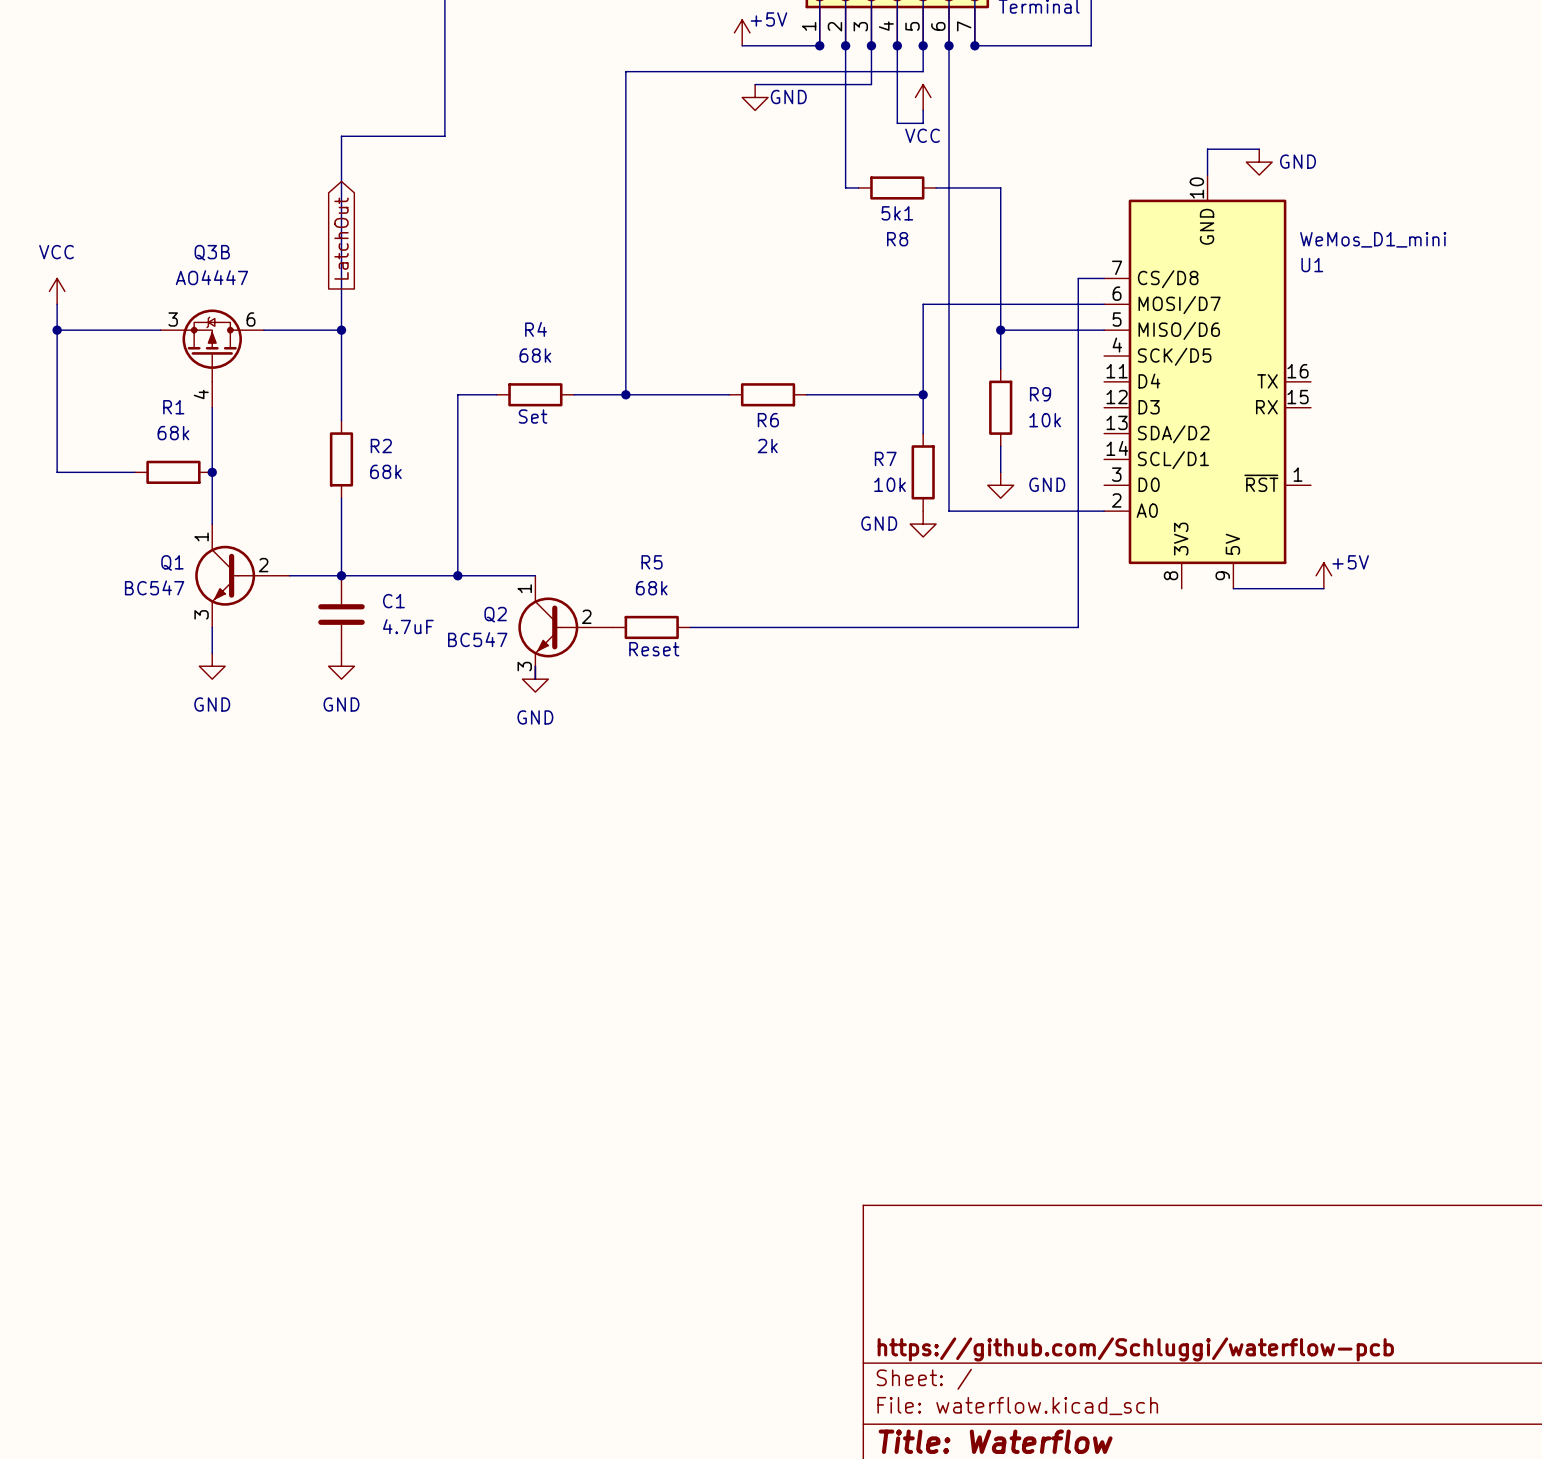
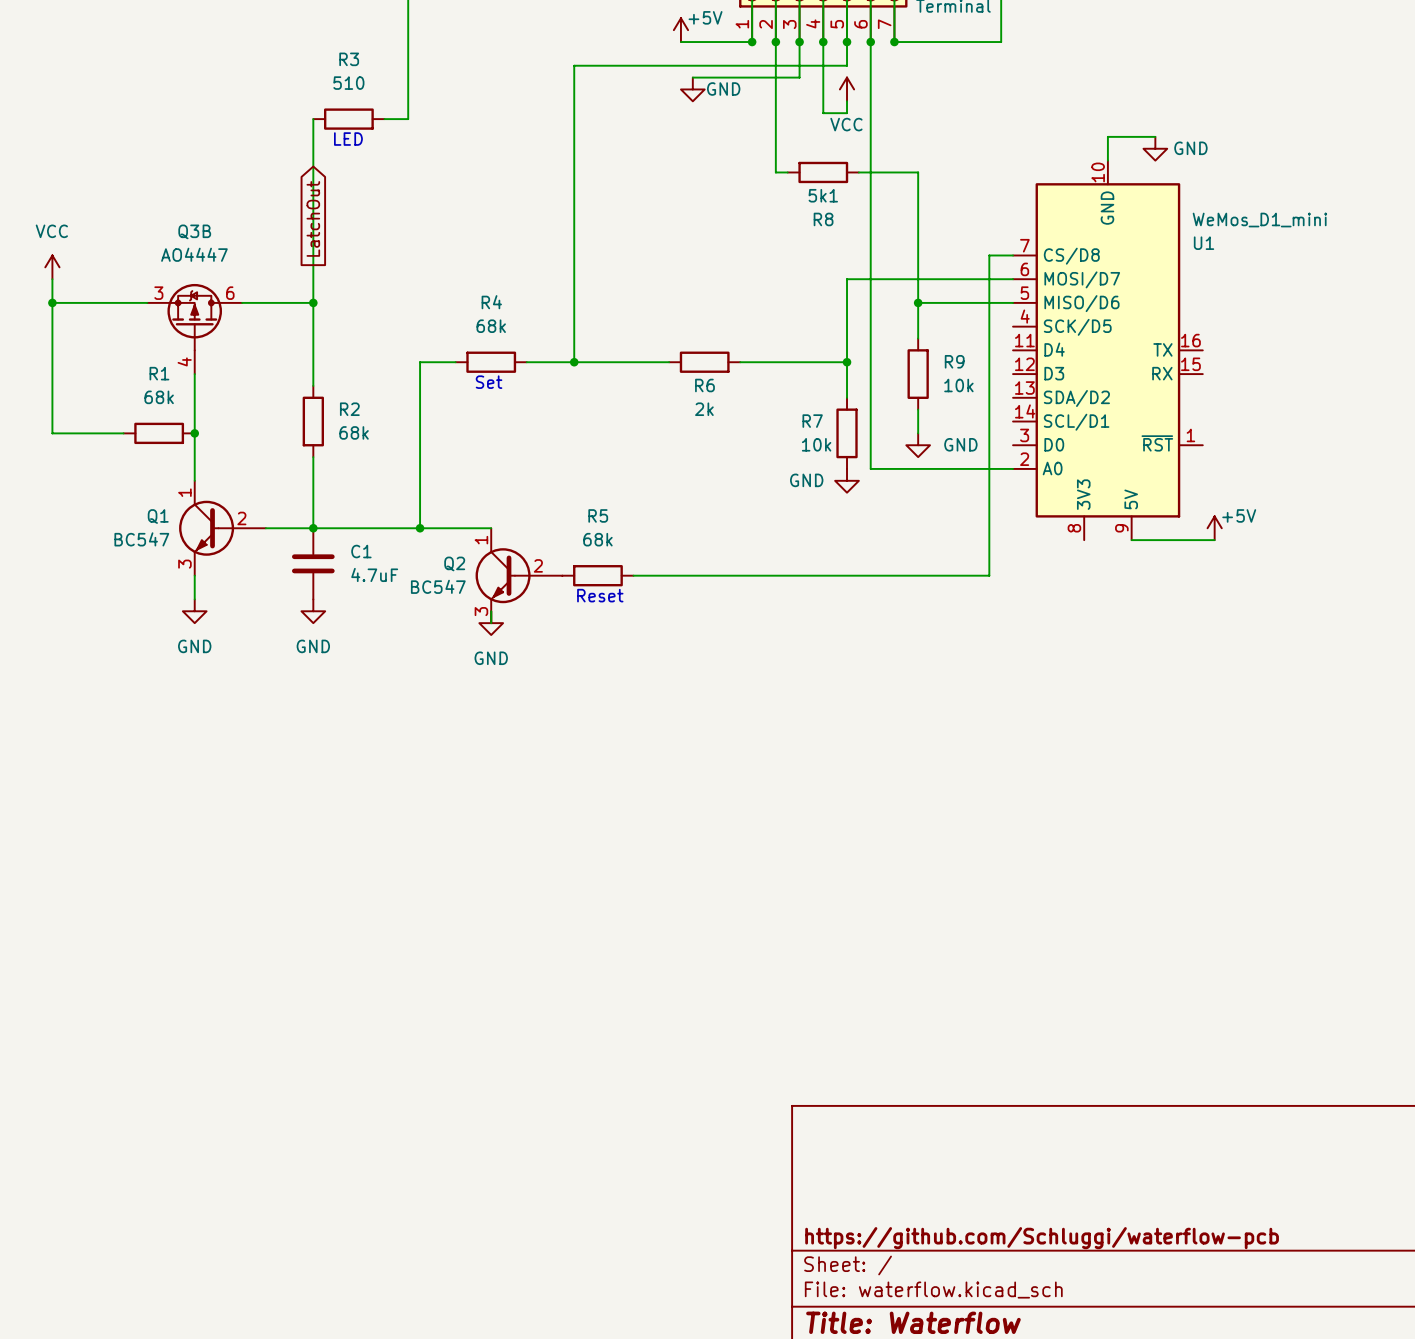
wire: none -> (313, 119) (313, 125)
R3: none -> 510 (348, 119)
wire: (444, 129) (444, 136) (341, 136) -> (408, 119) (384, 119)
text: none -> LED (348, 139)

